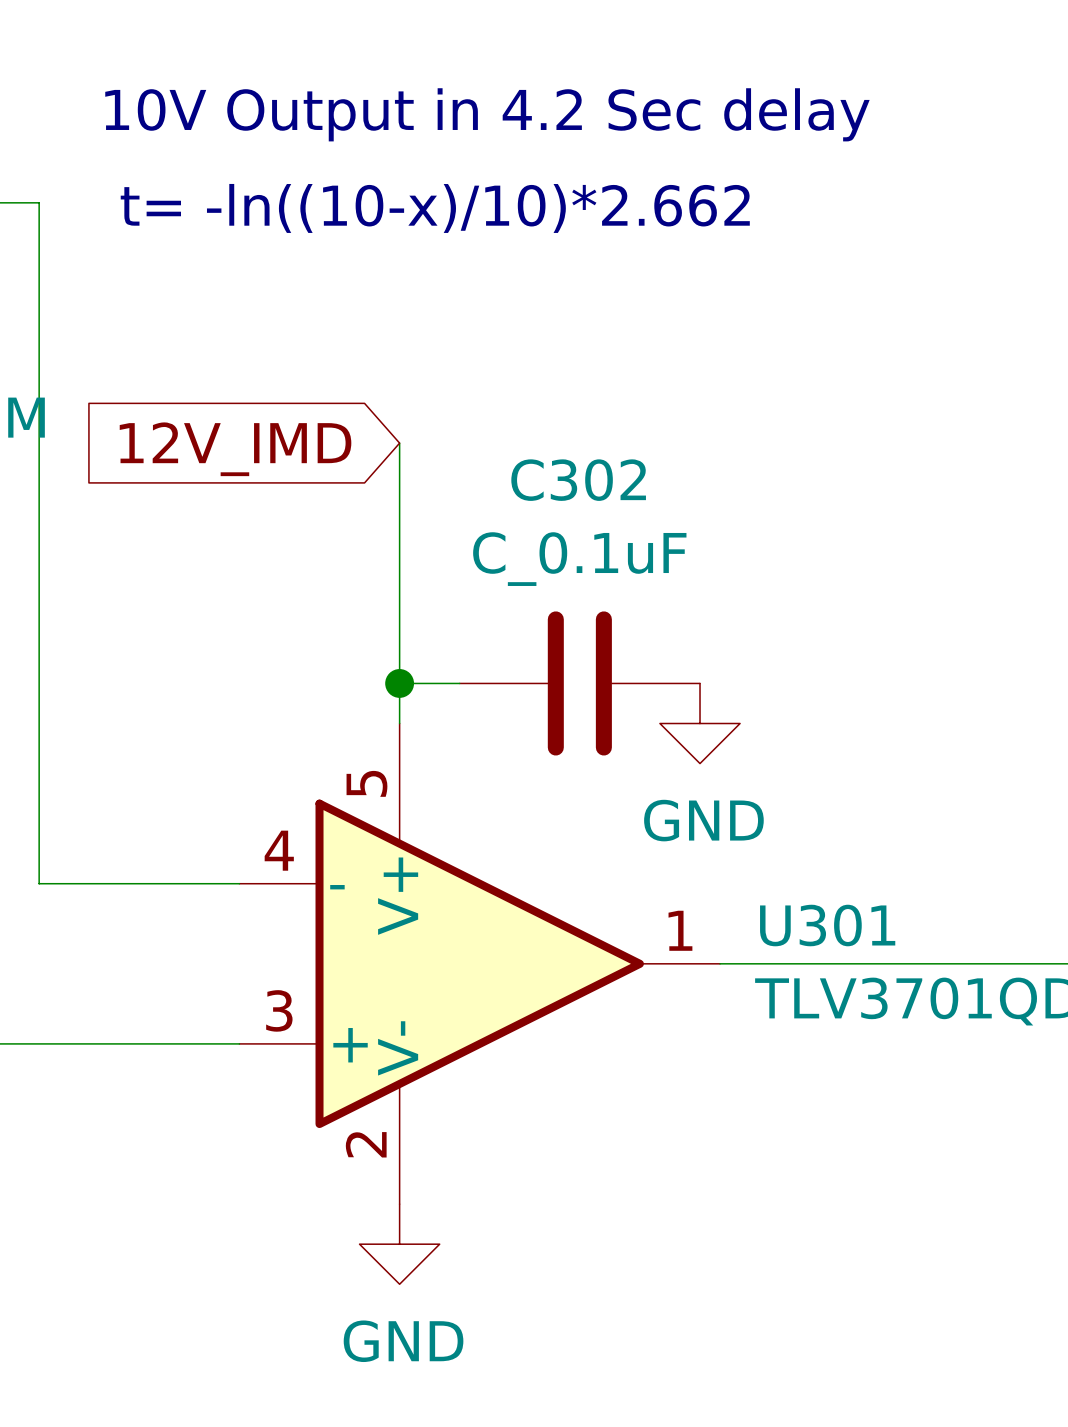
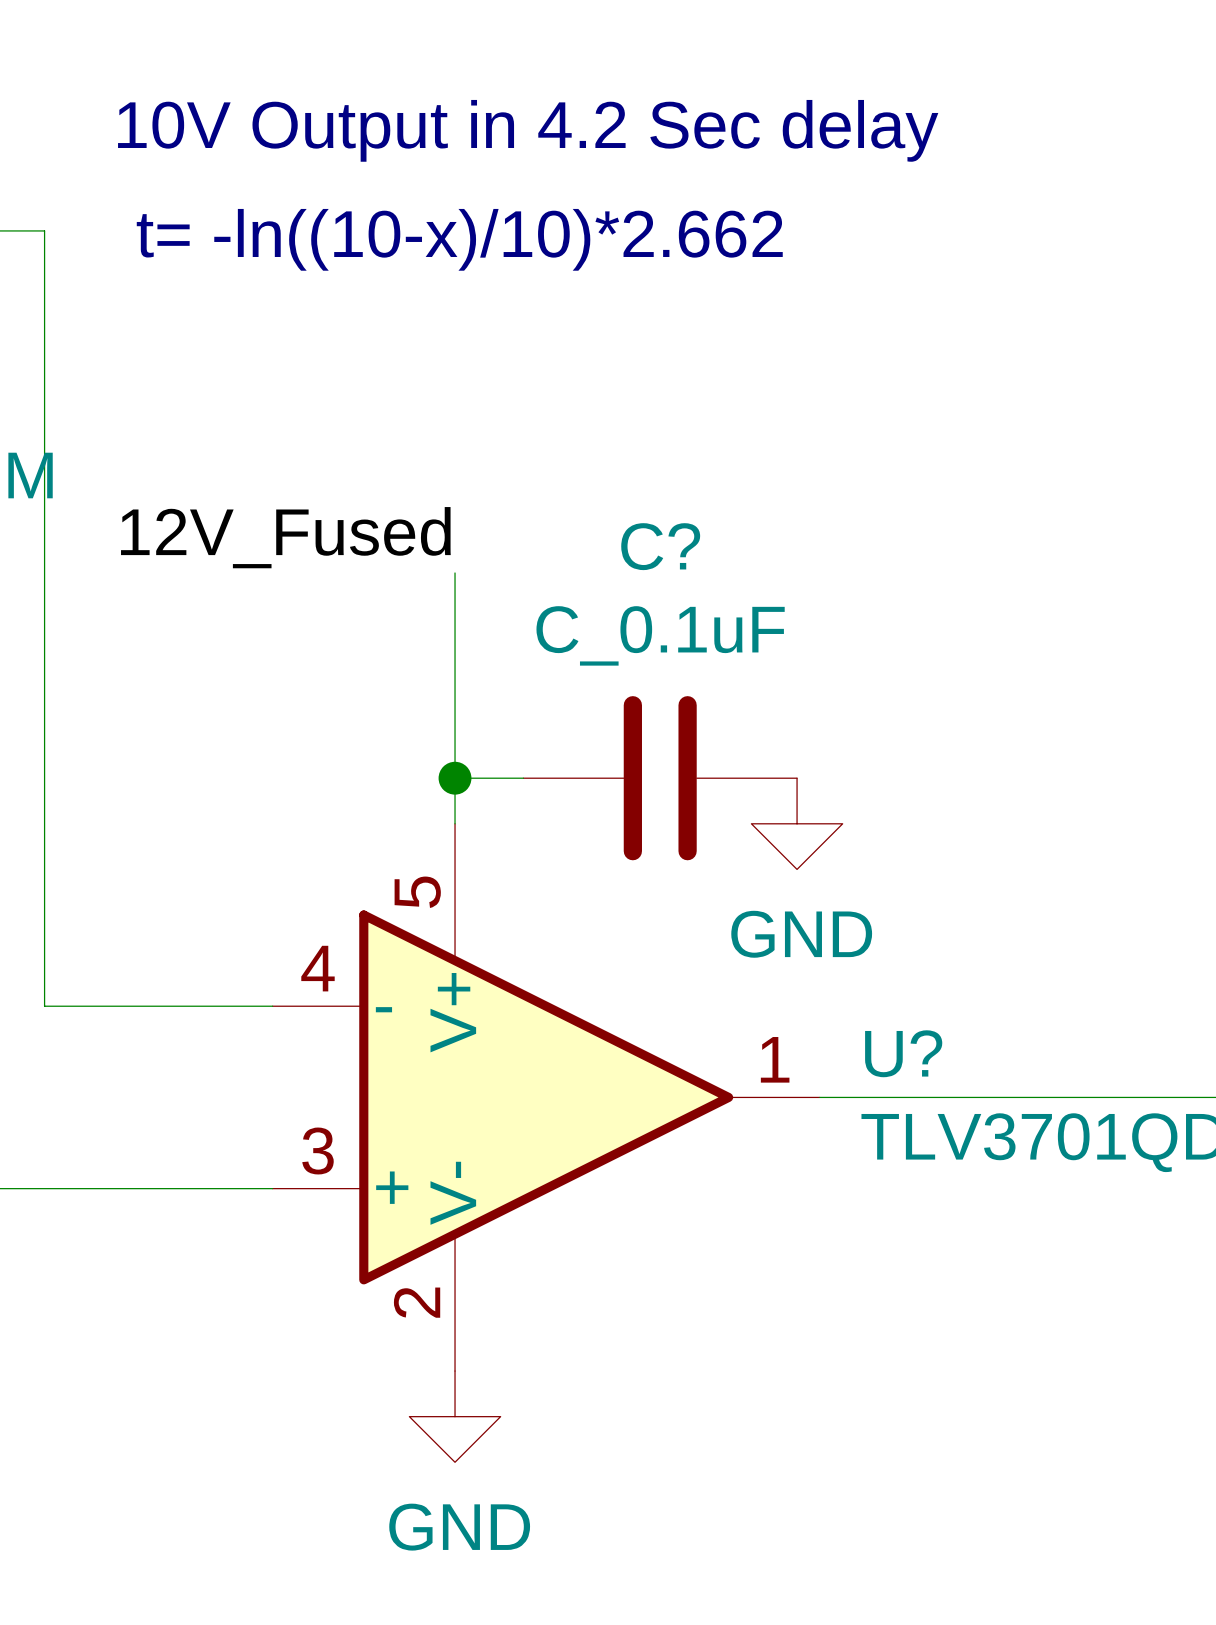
wire: (399, 443) (399, 503) -> none
global label: 12V_IMD (235, 449) -> none
label: none -> 12V_Fused (285, 537)
C302 name: C302 (578, 480) -> C? (660, 546)
U301 name: U301 (827, 925) -> U? (903, 1053)

